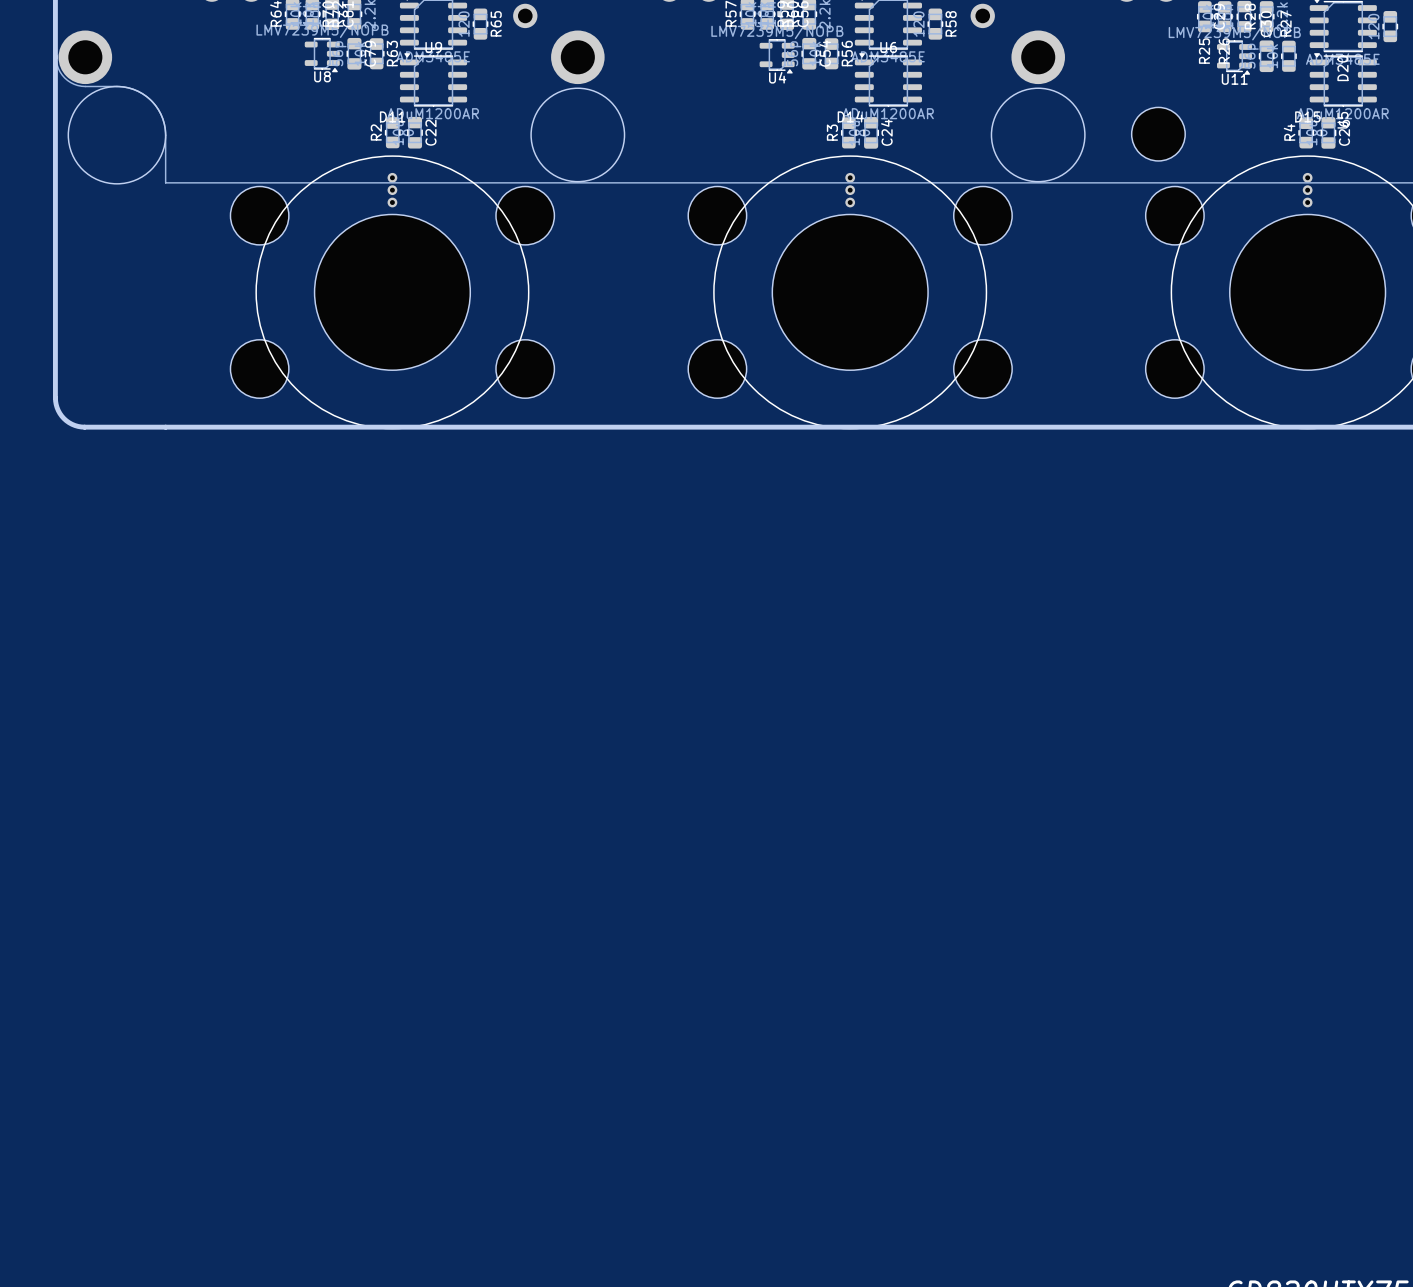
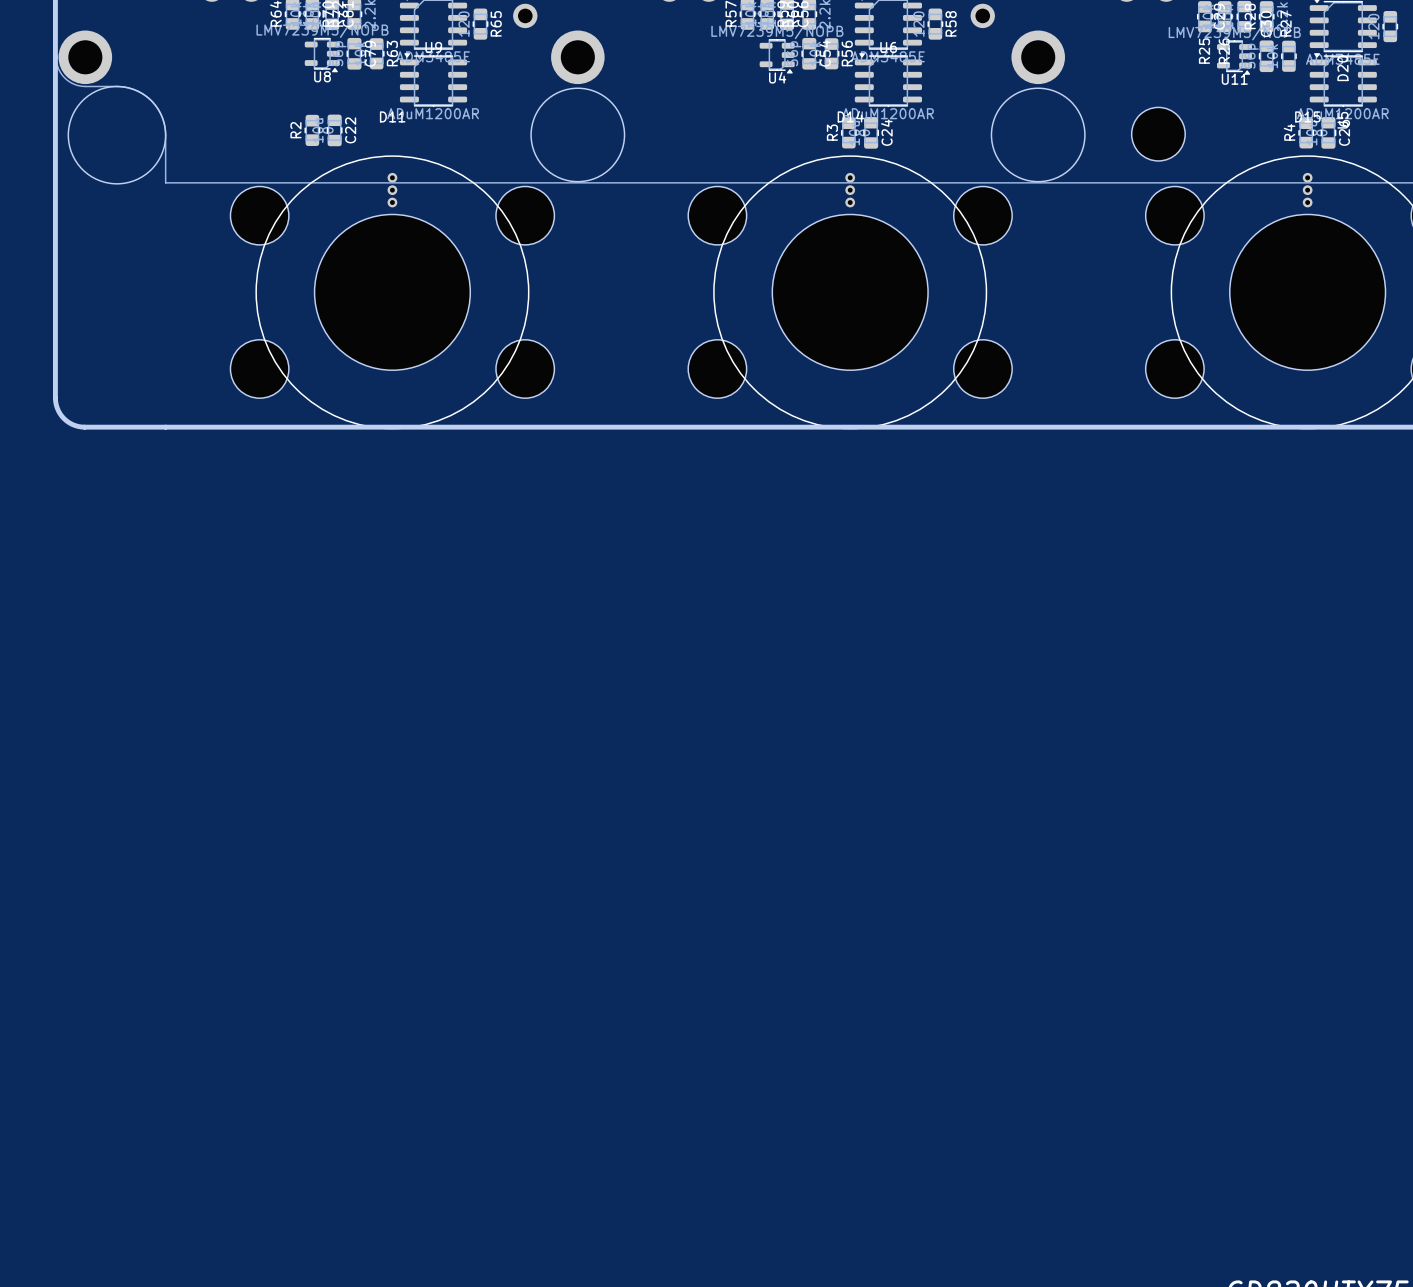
R2 position: (392, 132) -> (312, 130)
C22 position: (414, 132) -> (334, 130)

